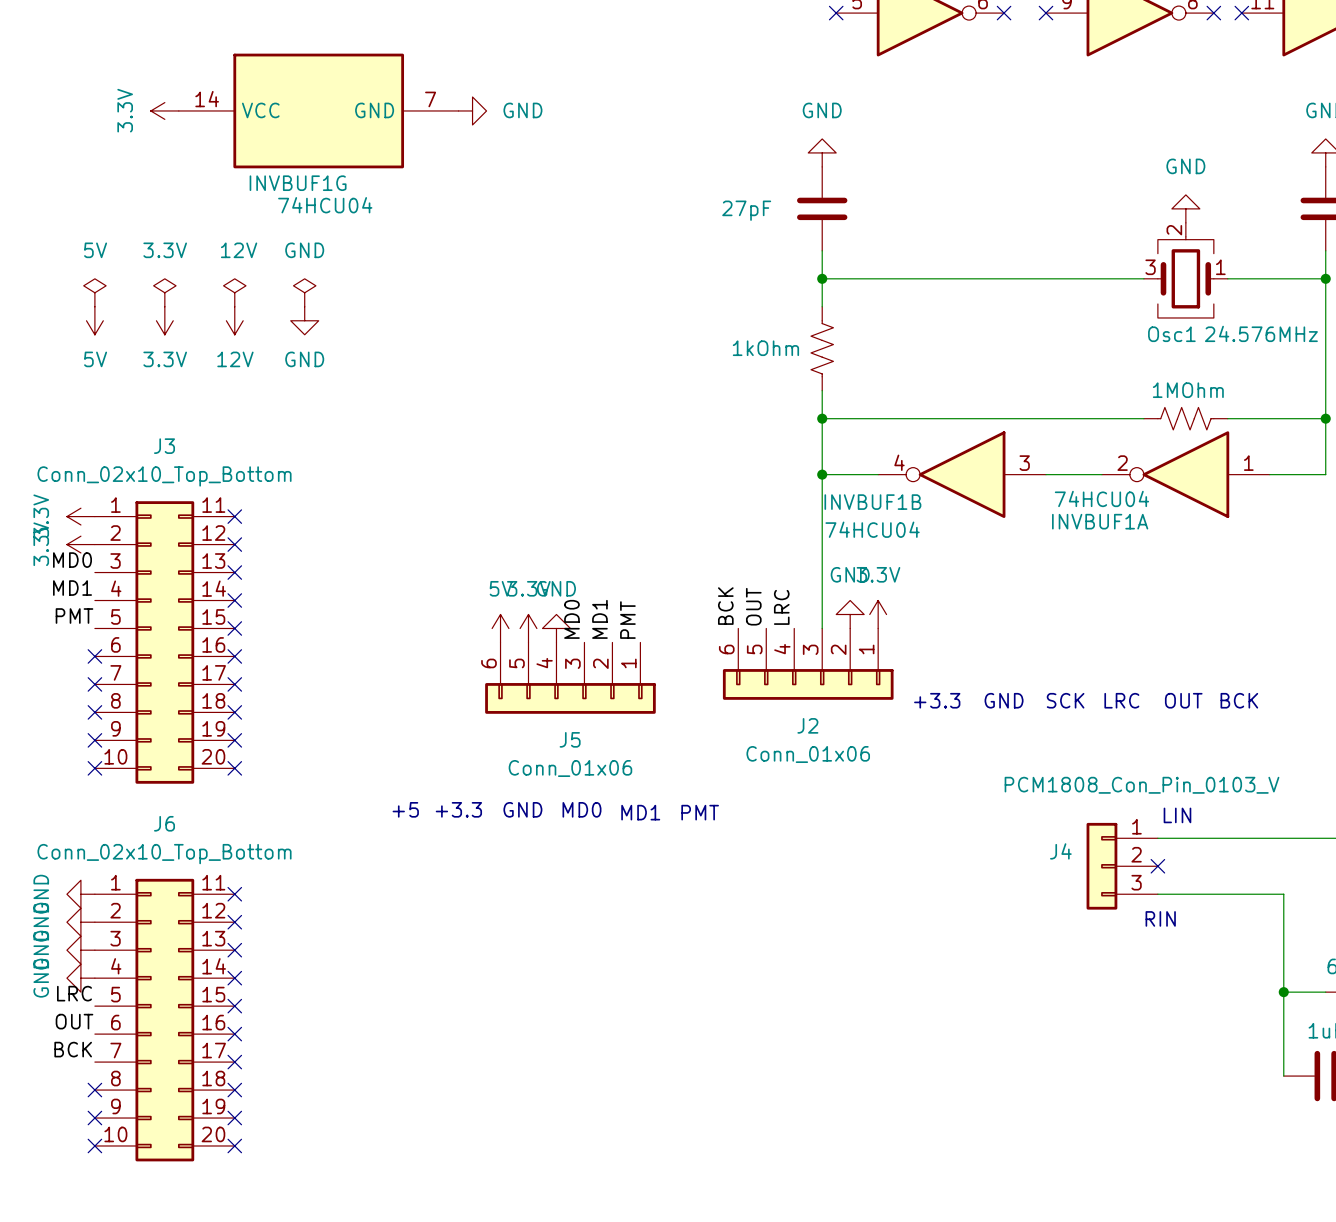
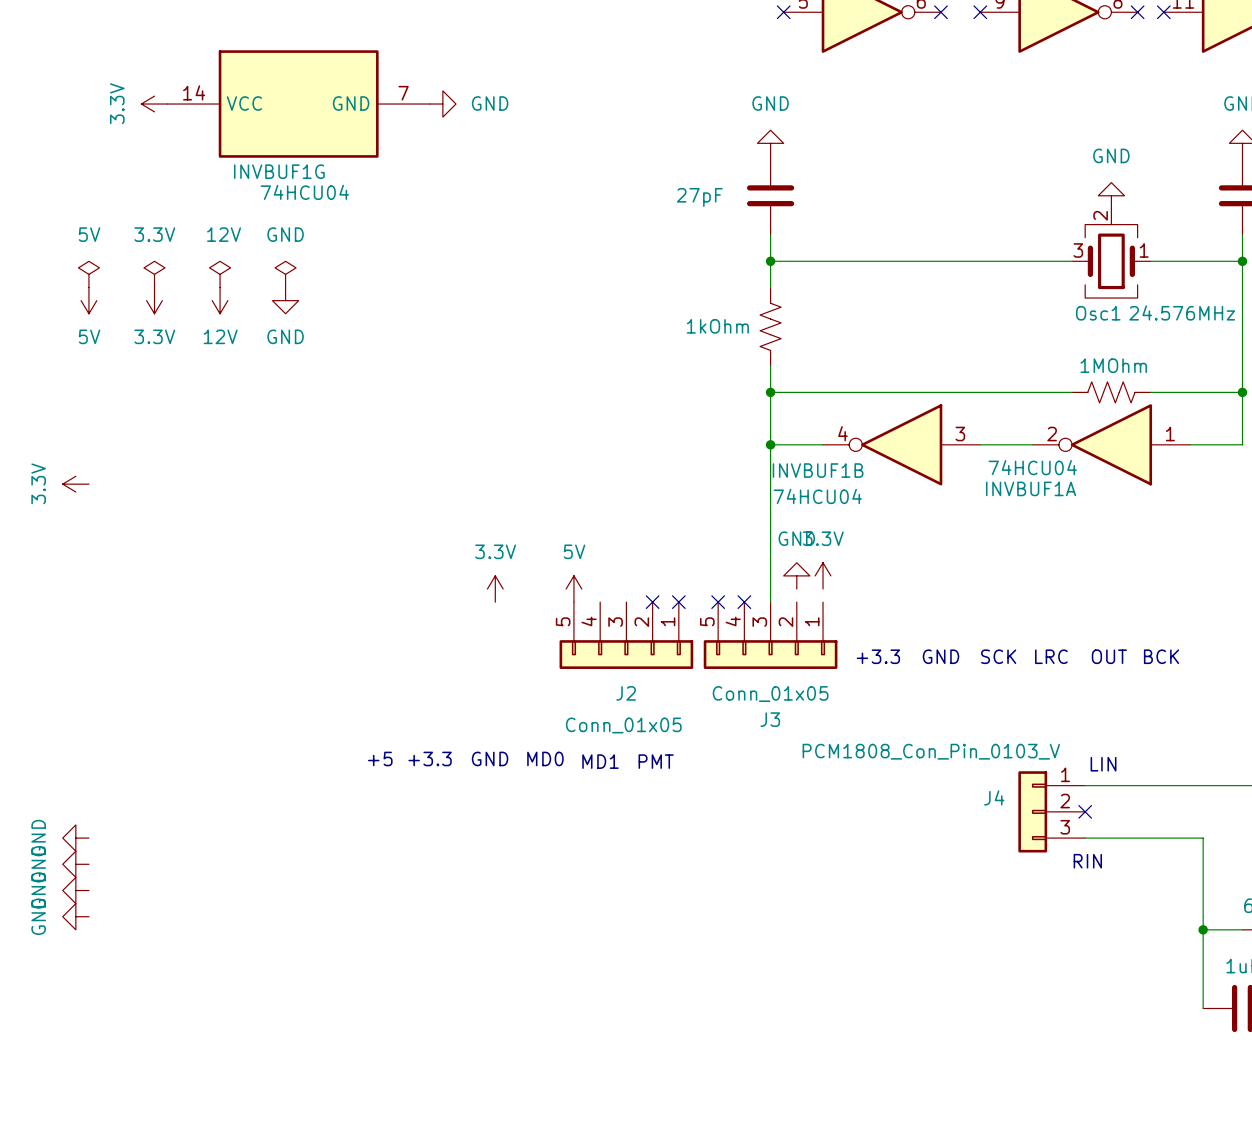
J3 name position: J3 (164, 446) -> J3 (770, 719)
J3 value: Conn_02x10_Top_Bottom (164, 476) -> Conn_01x05 (770, 694)
J3 symbol: [94, 501, 235, 784] -> [703, 602, 838, 669]
no-connect mark: (234, 516) -> none
power symbol: 3.3V (80, 544) -> none
no-connect mark: (234, 544) -> none
label: MD0 (72, 560) -> none
no-connect mark: (234, 572) -> none
label: MD1 (72, 588) -> none
no-connect mark: (234, 600) -> none
label: BCK (725, 606) -> none
label: OUT (753, 606) -> none
label: LRC (781, 607) -> none
label: PMT (74, 616) -> none
label: MD0 (571, 619) -> none
label: MD1 (599, 619) -> none
label: PMT (627, 620) -> none
no-connect mark: (234, 628) -> none
power symbol position: 5V (500, 628) -> 5V (573, 589)
power symbol: GND (556, 628) -> none
J2 symbol: [722, 628, 894, 700] -> [559, 602, 694, 669]
no-connect mark: none -> (652, 602)
no-connect mark: none -> (678, 602)
no-connect mark: none -> (718, 602)
no-connect mark: none -> (744, 602)
no-connect mark: (94, 656) -> none
no-connect mark: (234, 656) -> none
J5: Conn_01x06 (570, 678) -> none
no-connect mark: (94, 684) -> none
no-connect mark: (234, 684) -> none
no-connect mark: (94, 712) -> none
no-connect mark: (234, 712) -> none
no-connect mark: (94, 740) -> none
no-connect mark: (234, 740) -> none
J2 value: Conn_01x06 (808, 754) -> Conn_01x05 (623, 725)
no-connect mark: (94, 768) -> none
no-connect mark: (234, 768) -> none
J4 value position: PCM1808_Con_Pin_0103_V (1142, 785) -> PCM1808_Con_Pin_0103_V (931, 751)
no-connect mark: (234, 894) -> none
no-connect mark: (234, 922) -> none
no-connect mark: (234, 950) -> none
no-connect mark: (234, 978) -> none
label: LRC (74, 993) -> none
no-connect mark: (234, 1006) -> none
J6: Conn_02x10_Top_Bottom (164, 1020) -> none
label: OUT (74, 1021) -> none
no-connect mark: (234, 1034) -> none
label: BCK (73, 1049) -> none
no-connect mark: (234, 1062) -> none
no-connect mark: (94, 1090) -> none
no-connect mark: (234, 1090) -> none
no-connect mark: (94, 1118) -> none
no-connect mark: (234, 1118) -> none
no-connect mark: (94, 1145) -> none
no-connect mark: (234, 1145) -> none

